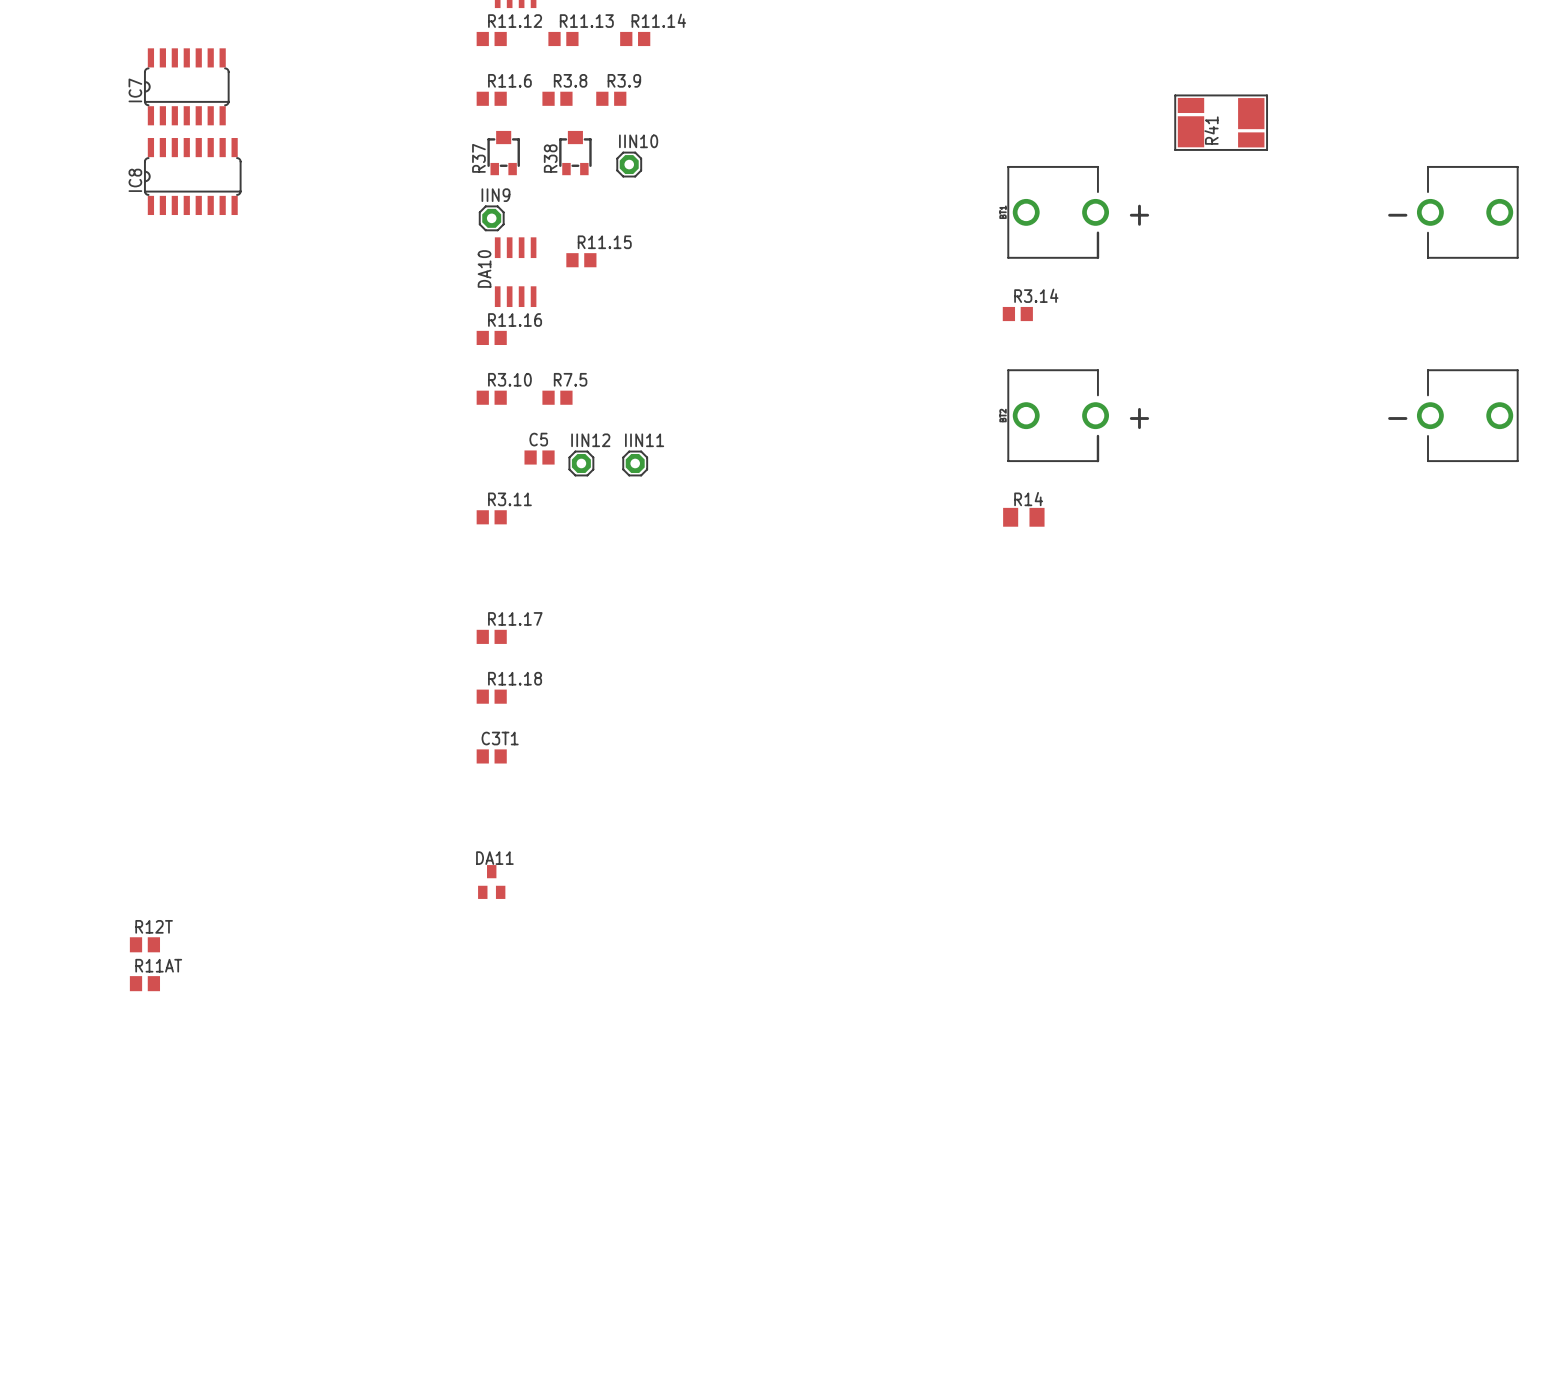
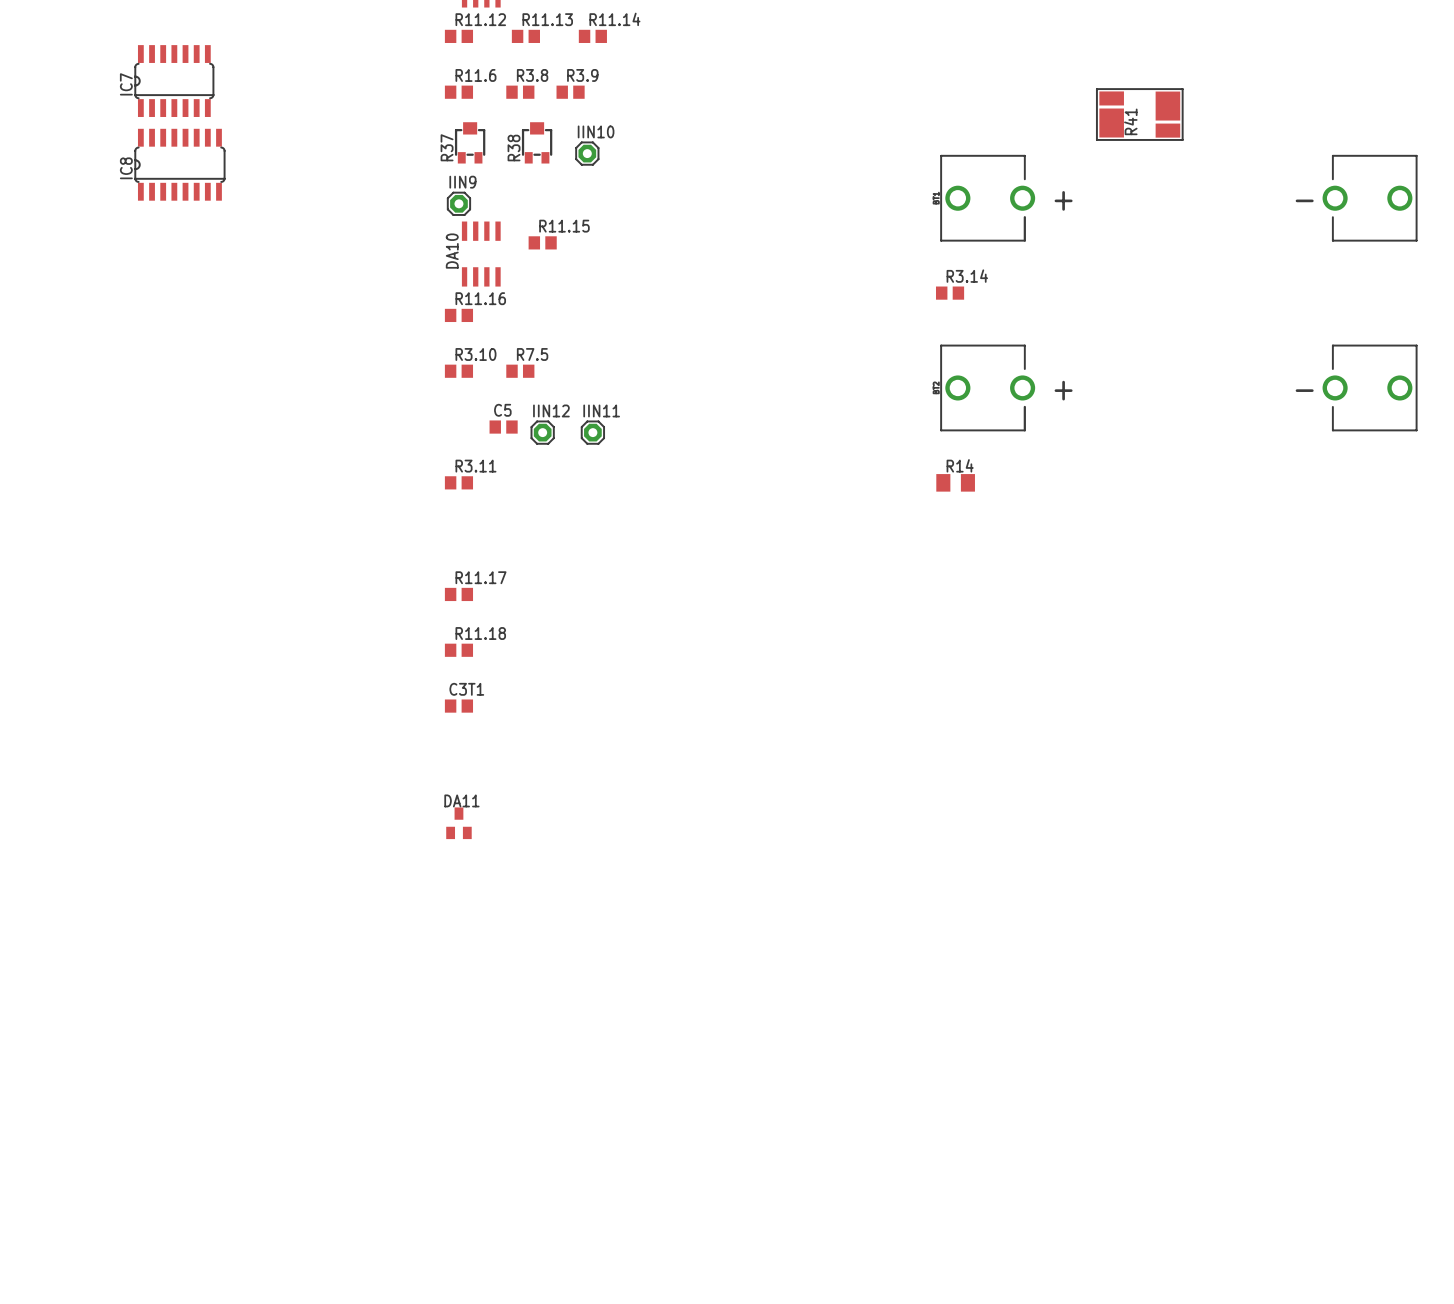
R12T: (144, 944) -> none
R11AT: (144, 983) -> none

